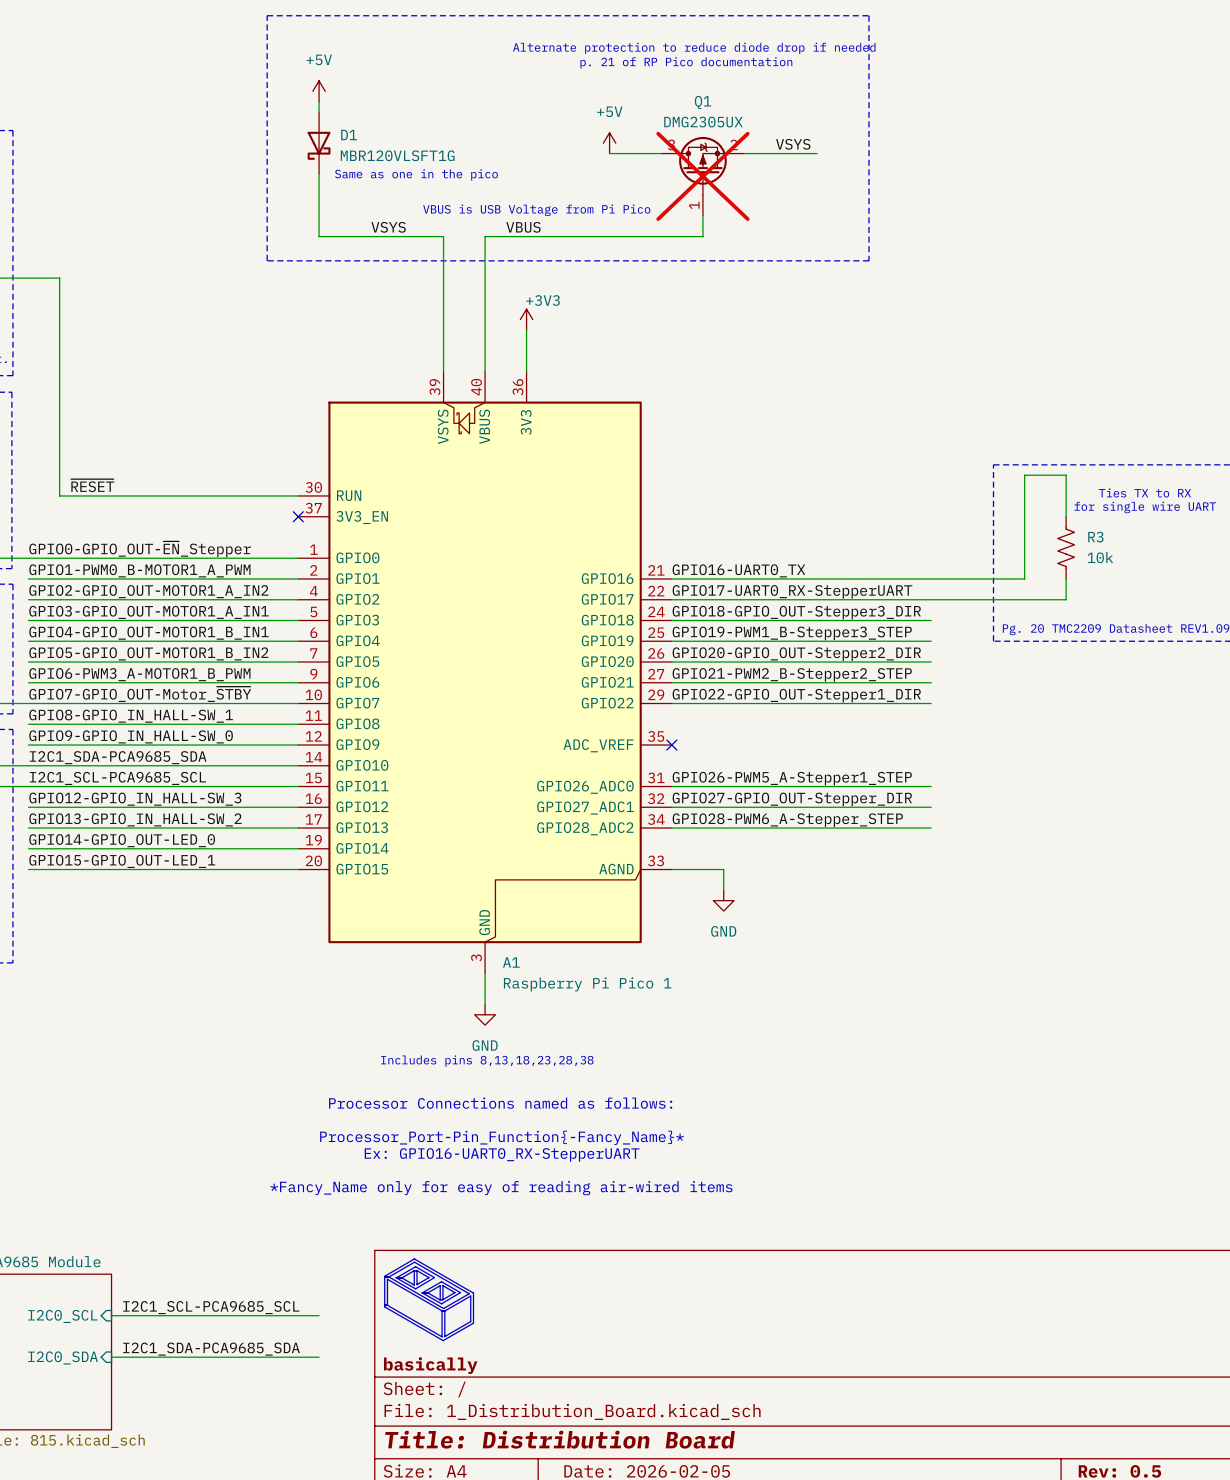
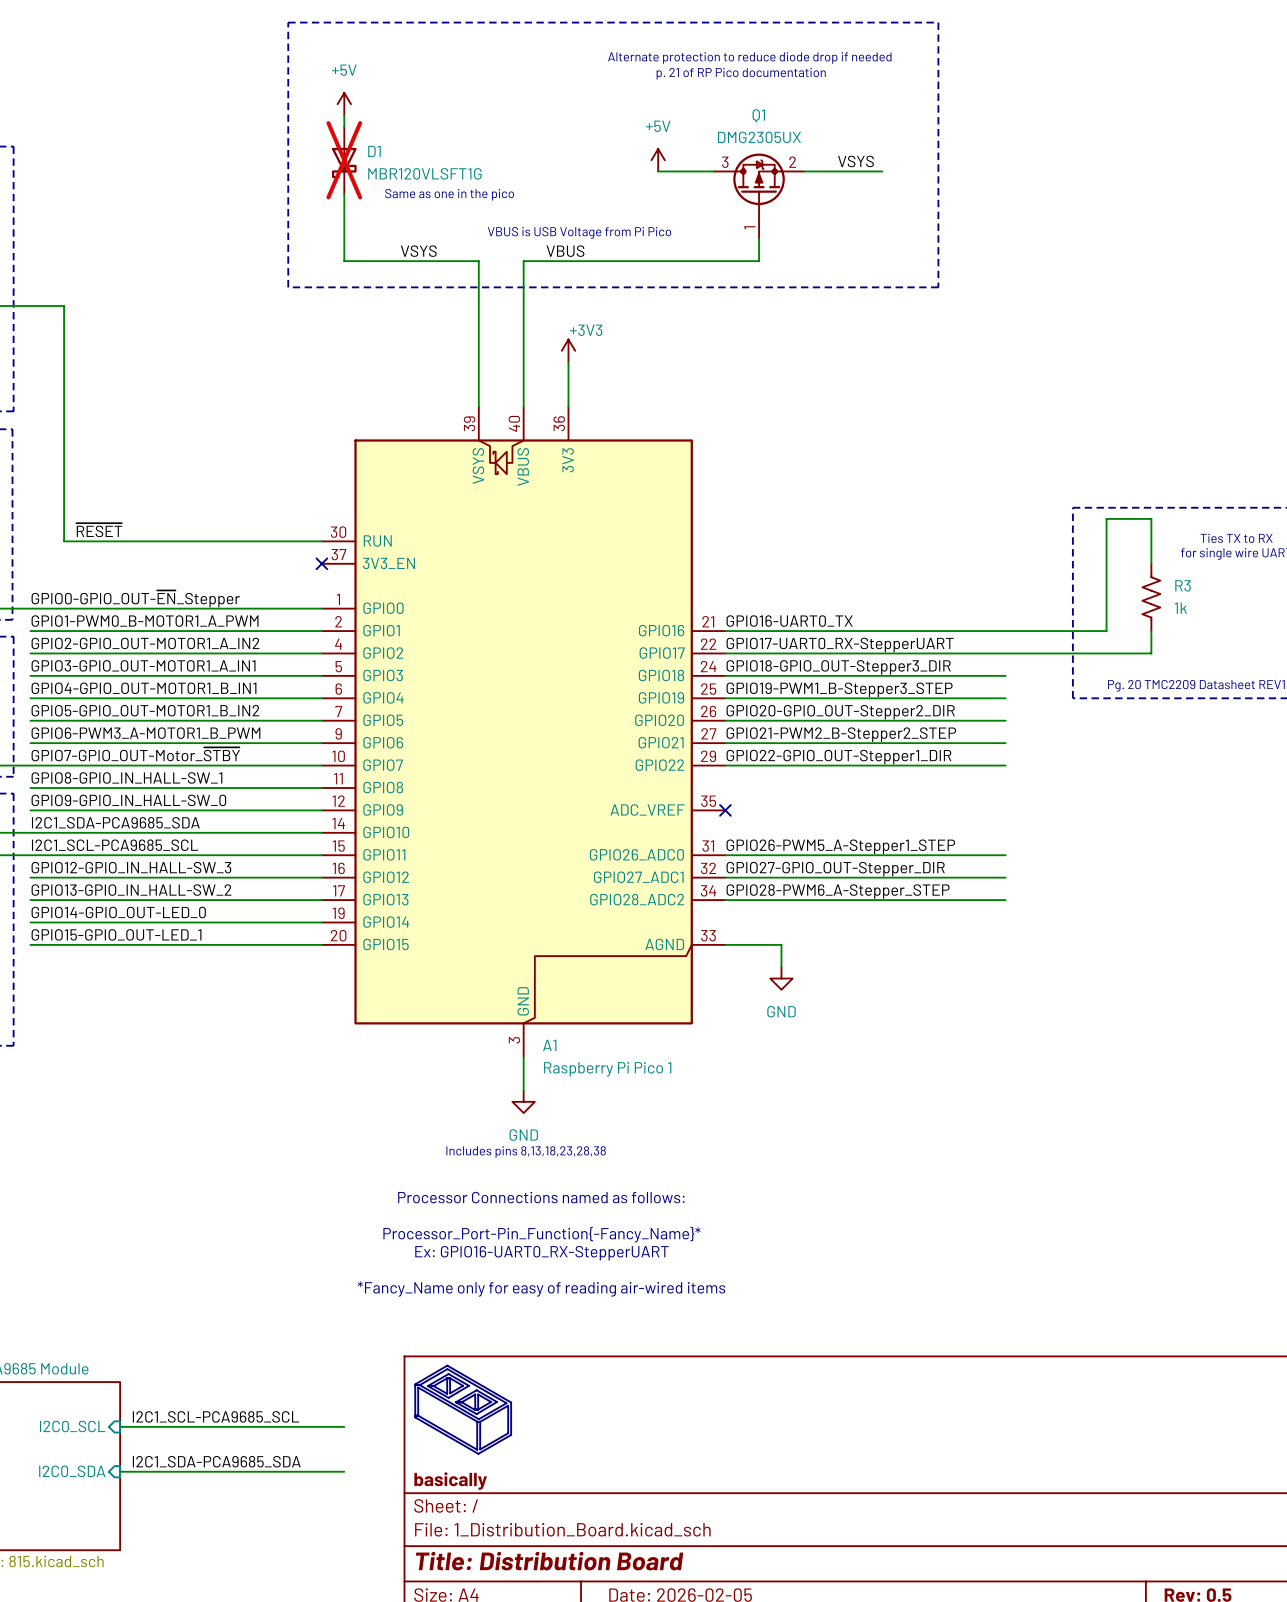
D1 do-not-place cross: none -> (344, 160)
Q1 do-not-place cross: (702, 176) -> none
R3 value: 10k (1100, 557) -> 1k (1180, 608)

